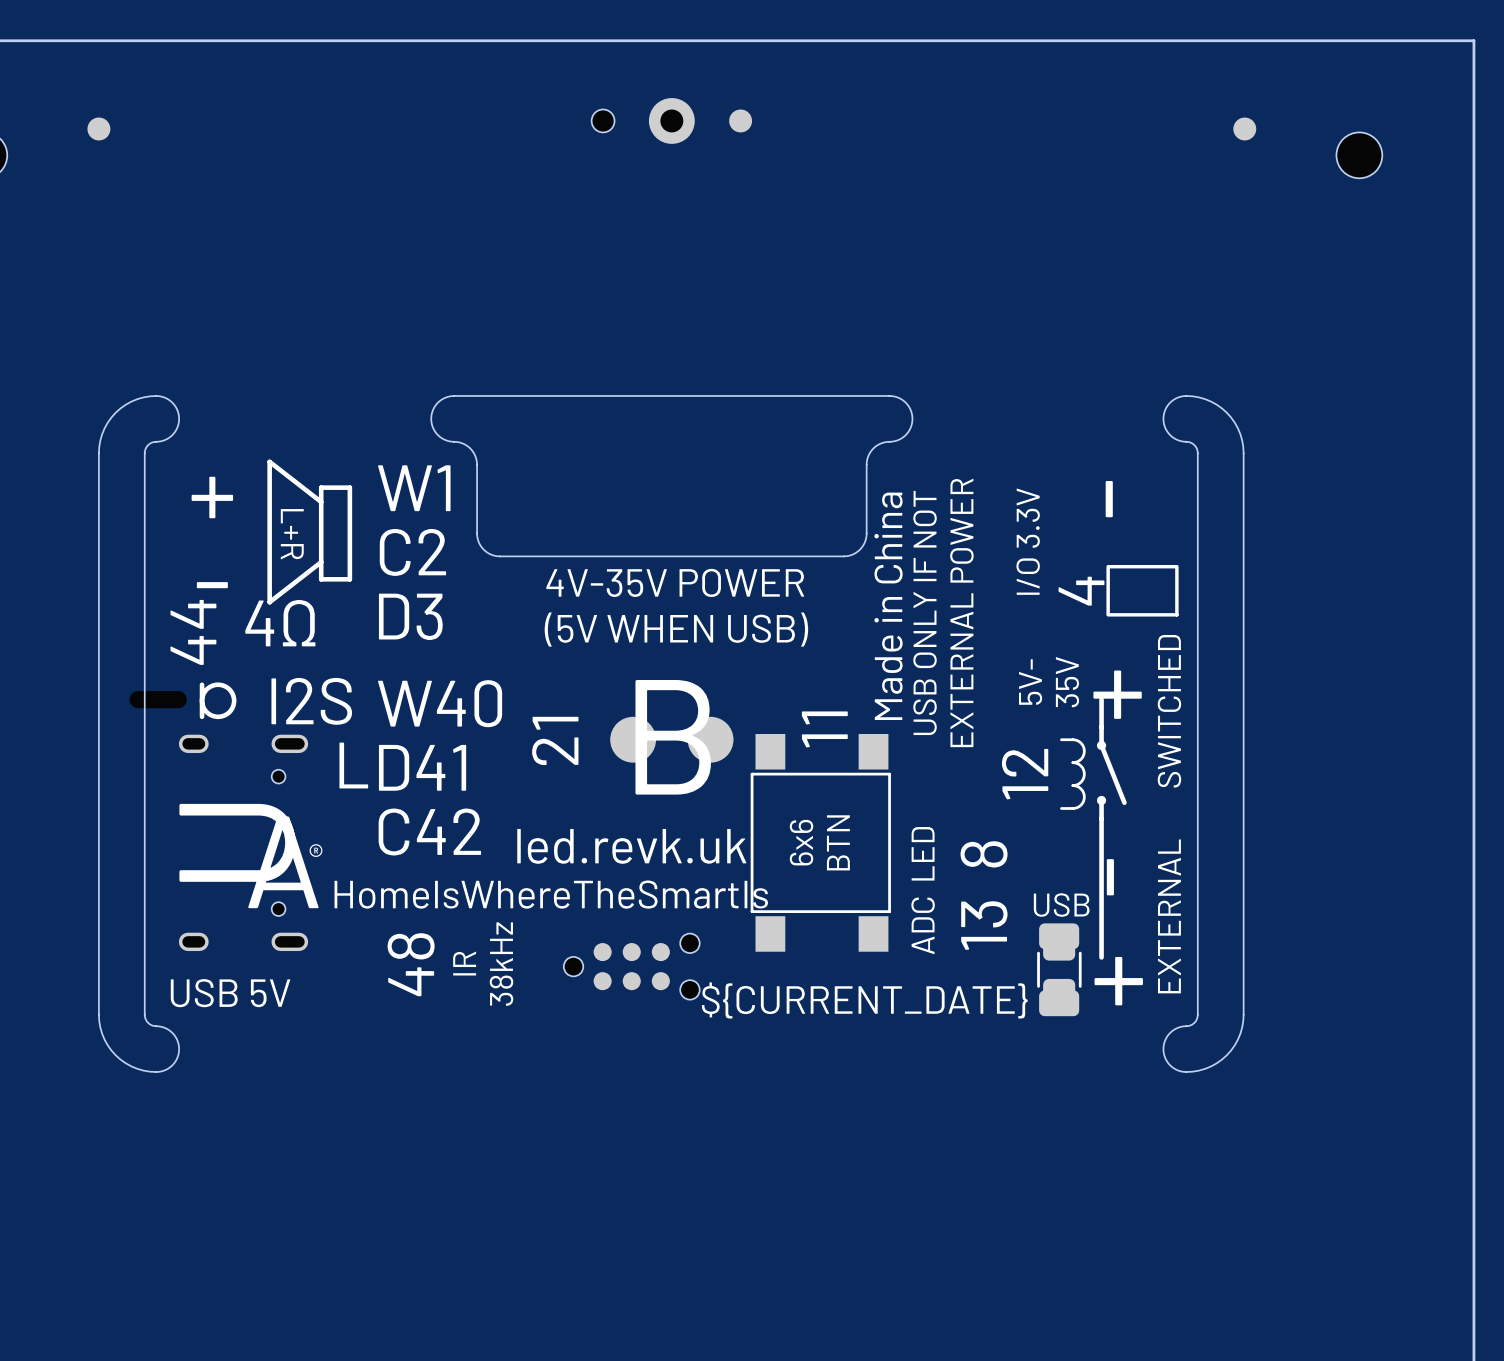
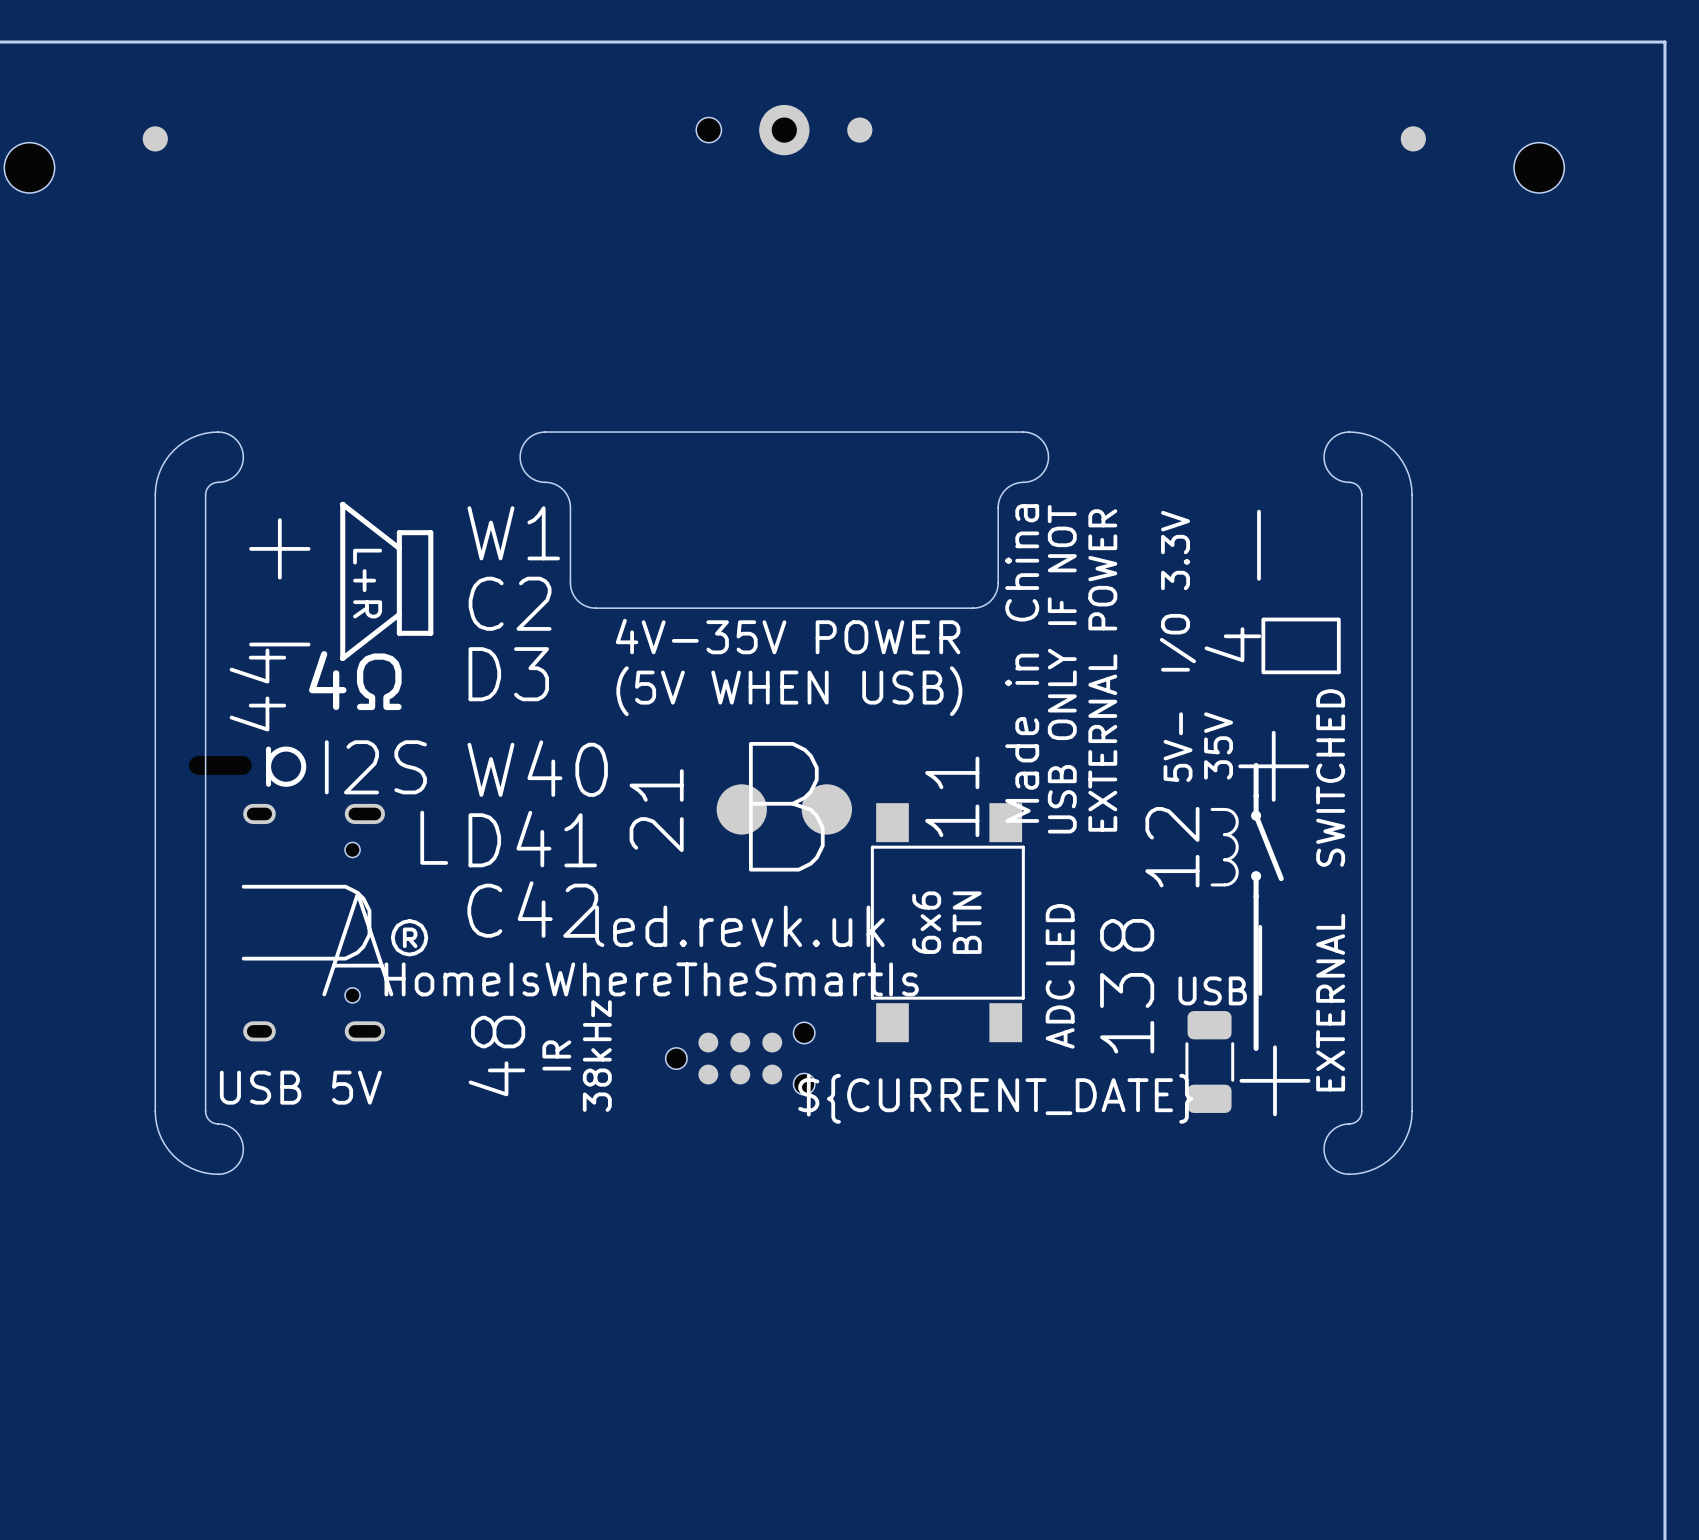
part footprint: [1037, 923, 1082, 1017] -> [1185, 1011, 1235, 1113]

